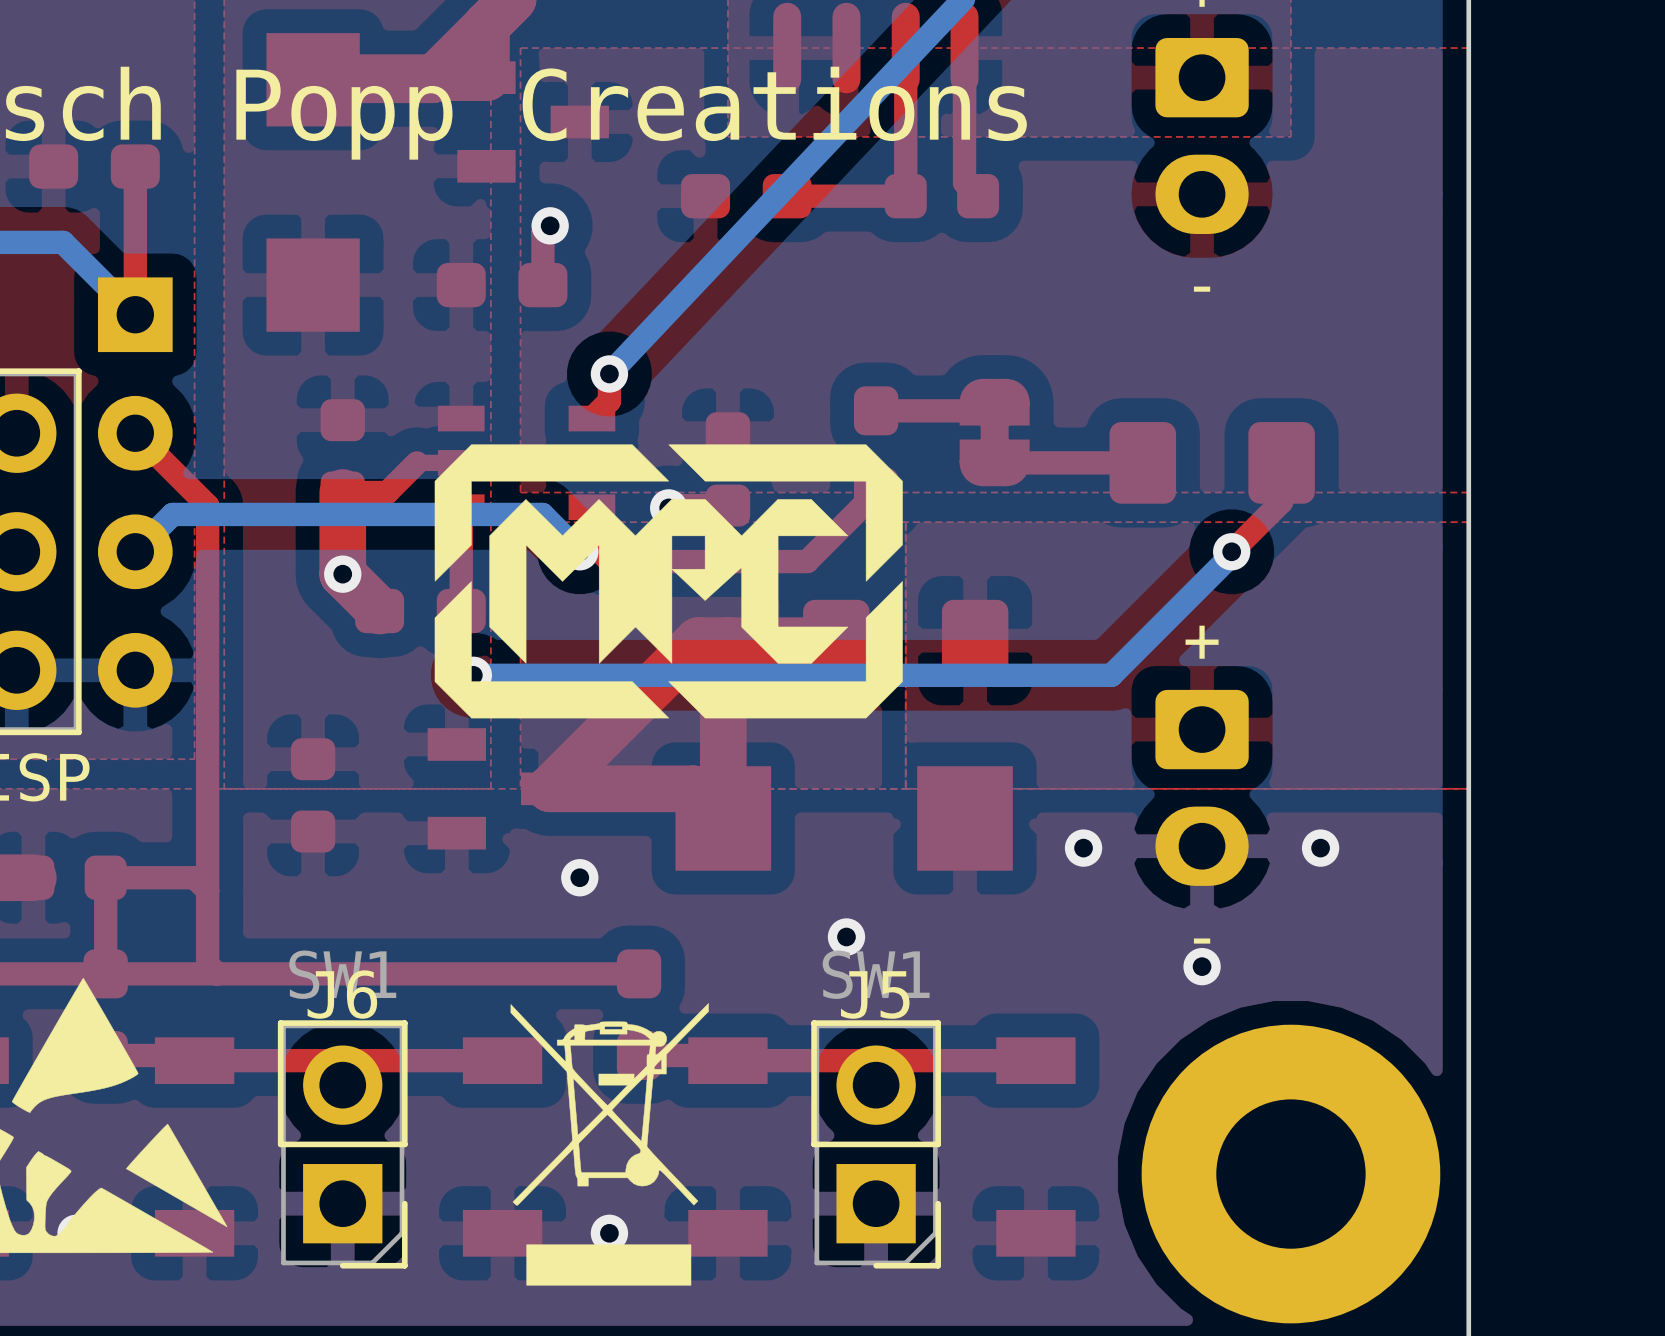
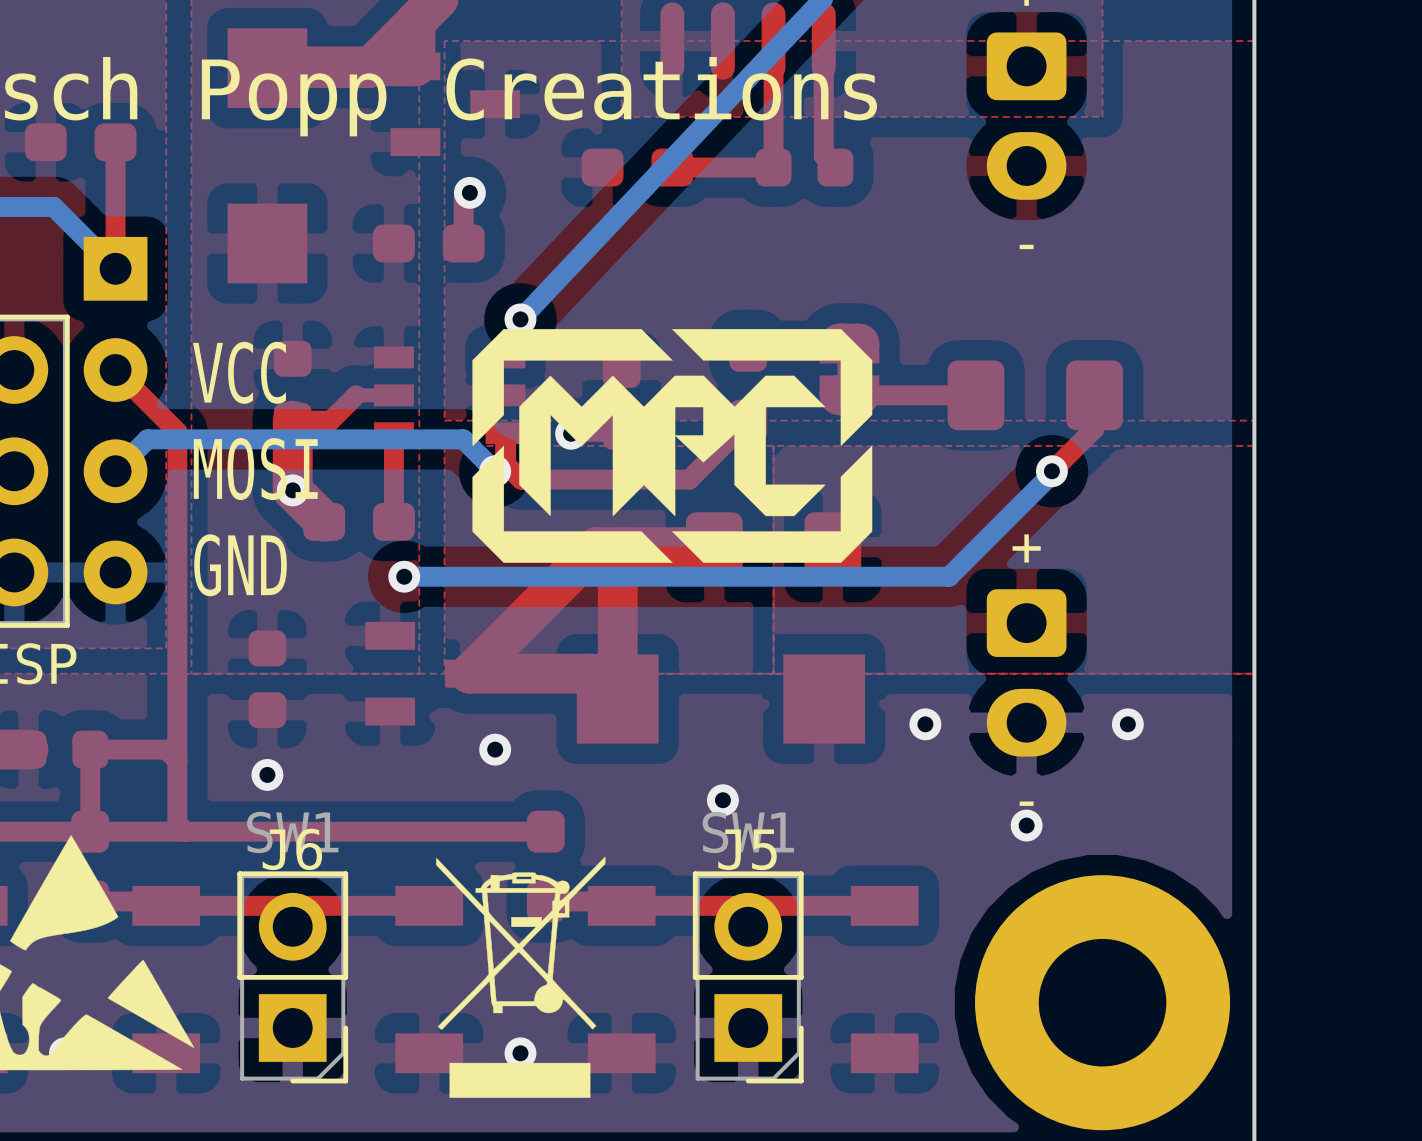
text: none -> VCC (239, 372)
text: none -> MOSI (255, 469)
drawing position: (668, 581) -> (672, 445)
text: none -> GND (240, 565)
via: none -> (267, 774)

